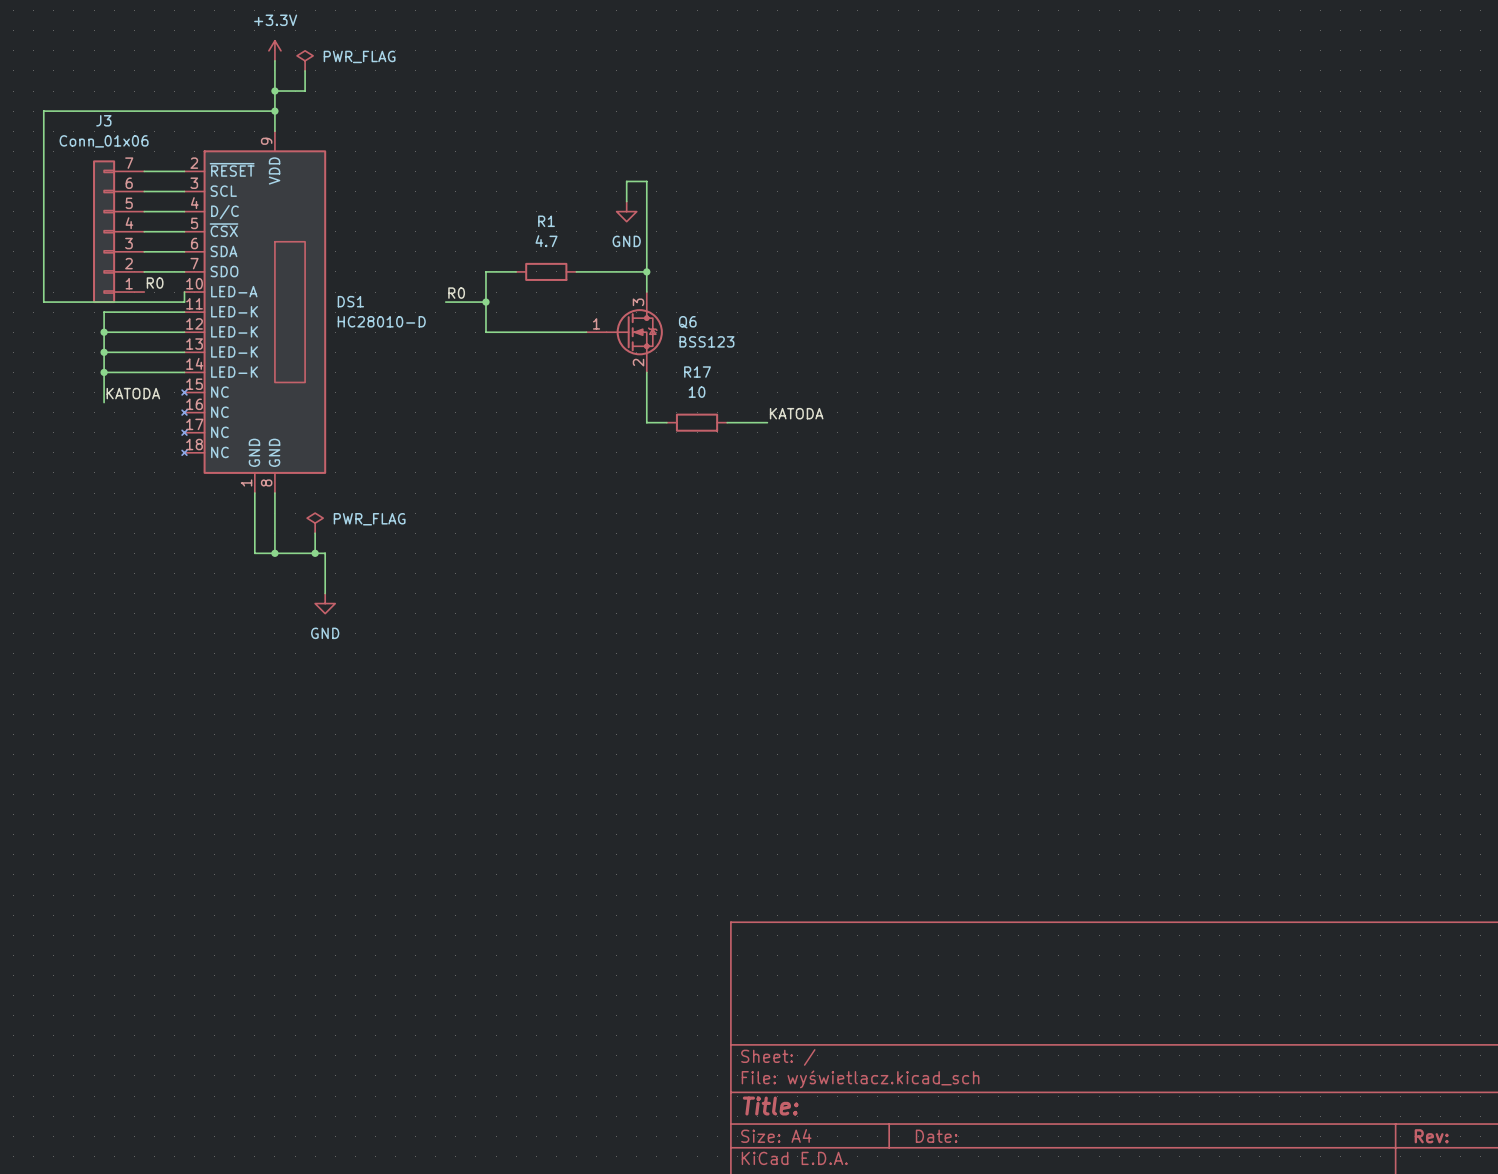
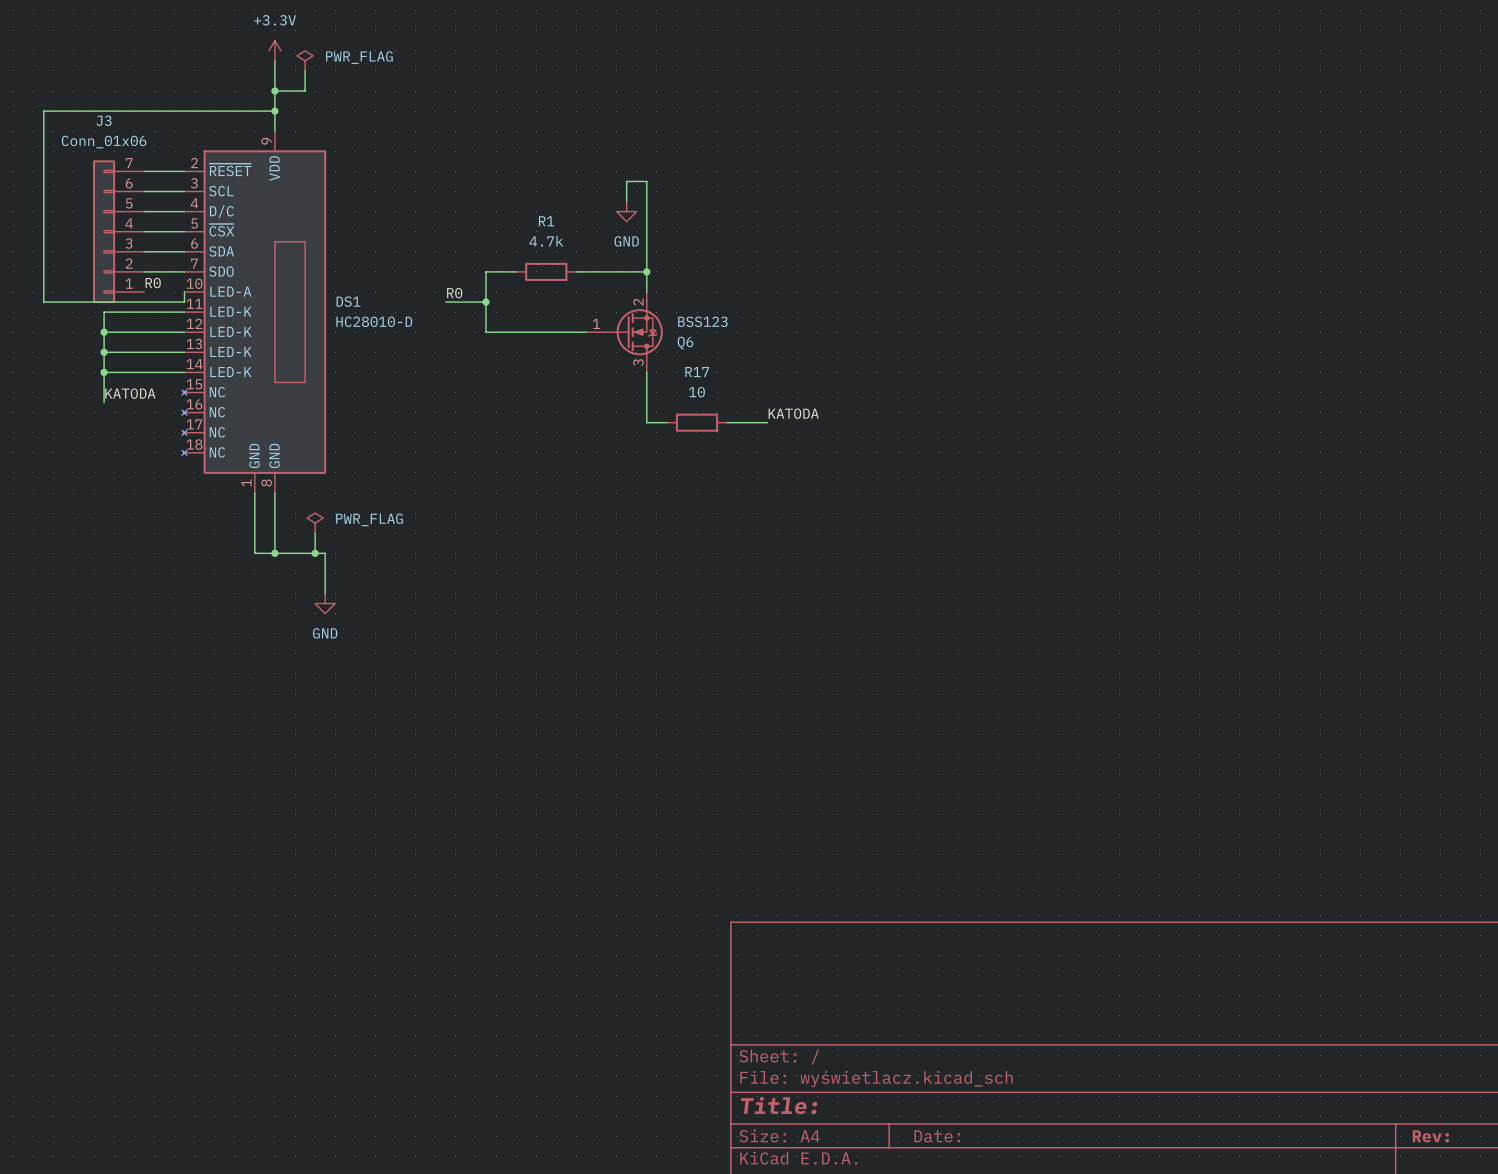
R1 value: 4.7 (546, 241) -> 4.7k (546, 241)
Q6 flip: as is (634, 332) -> up-down (634, 332)

